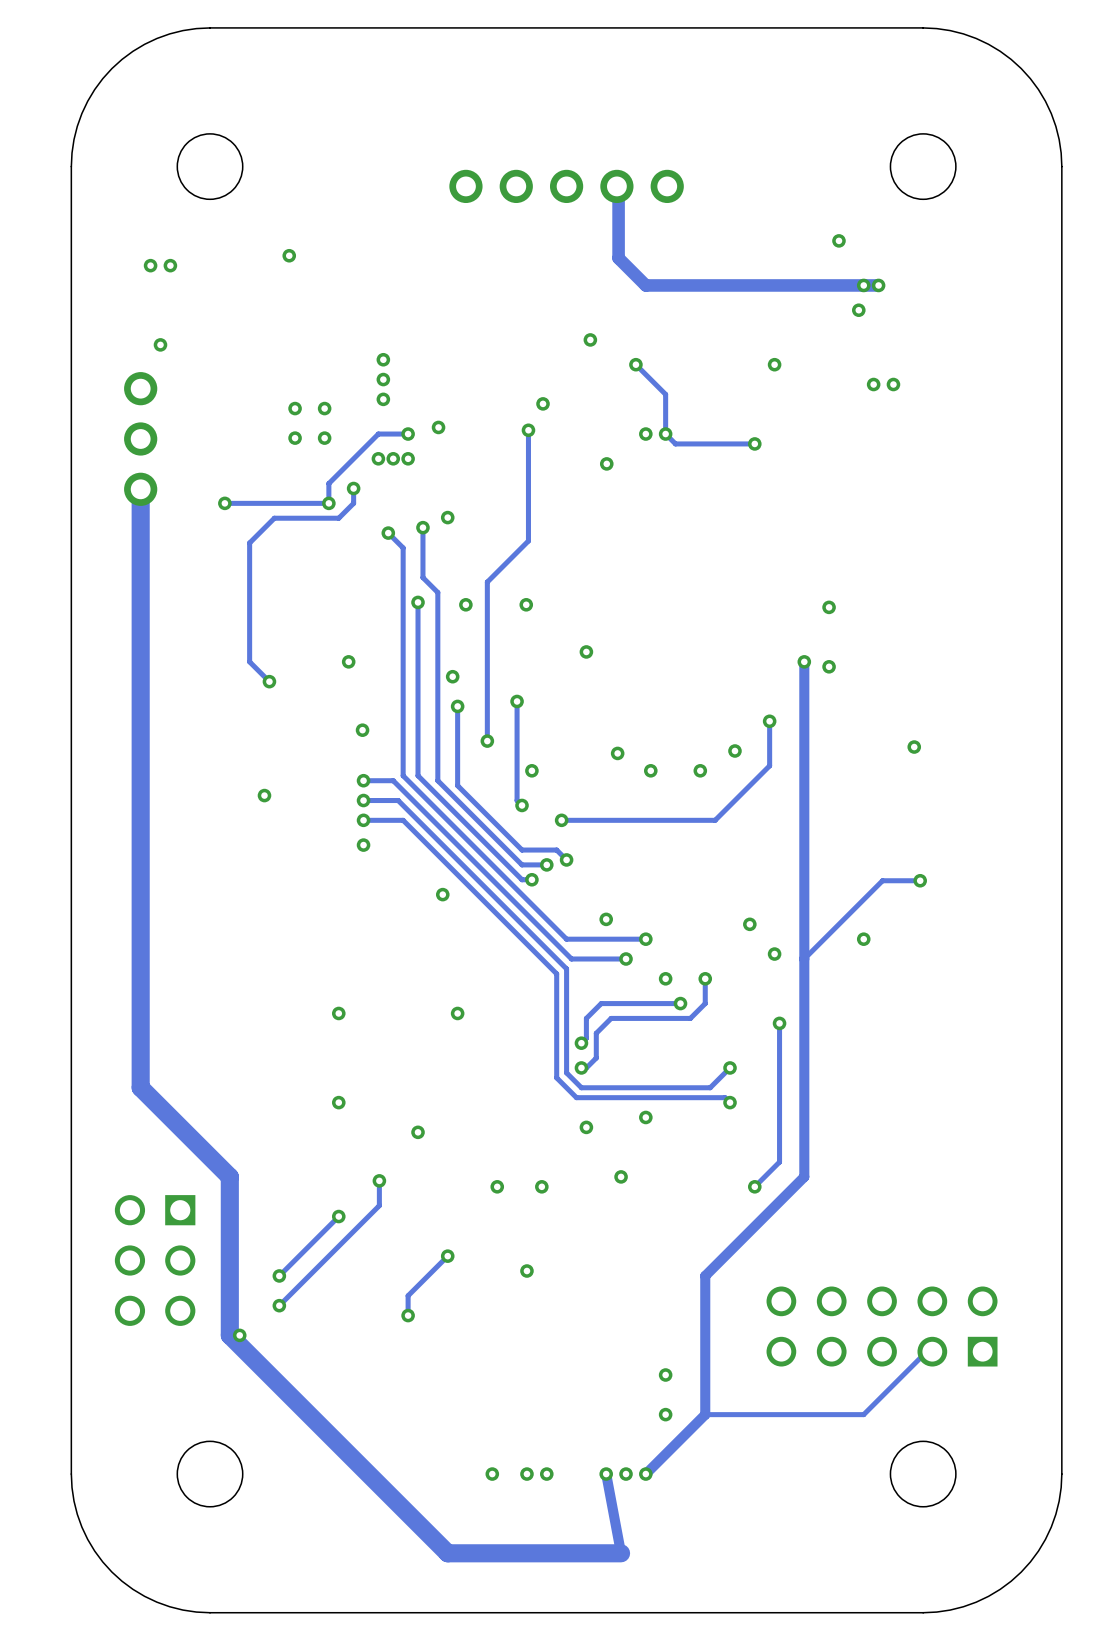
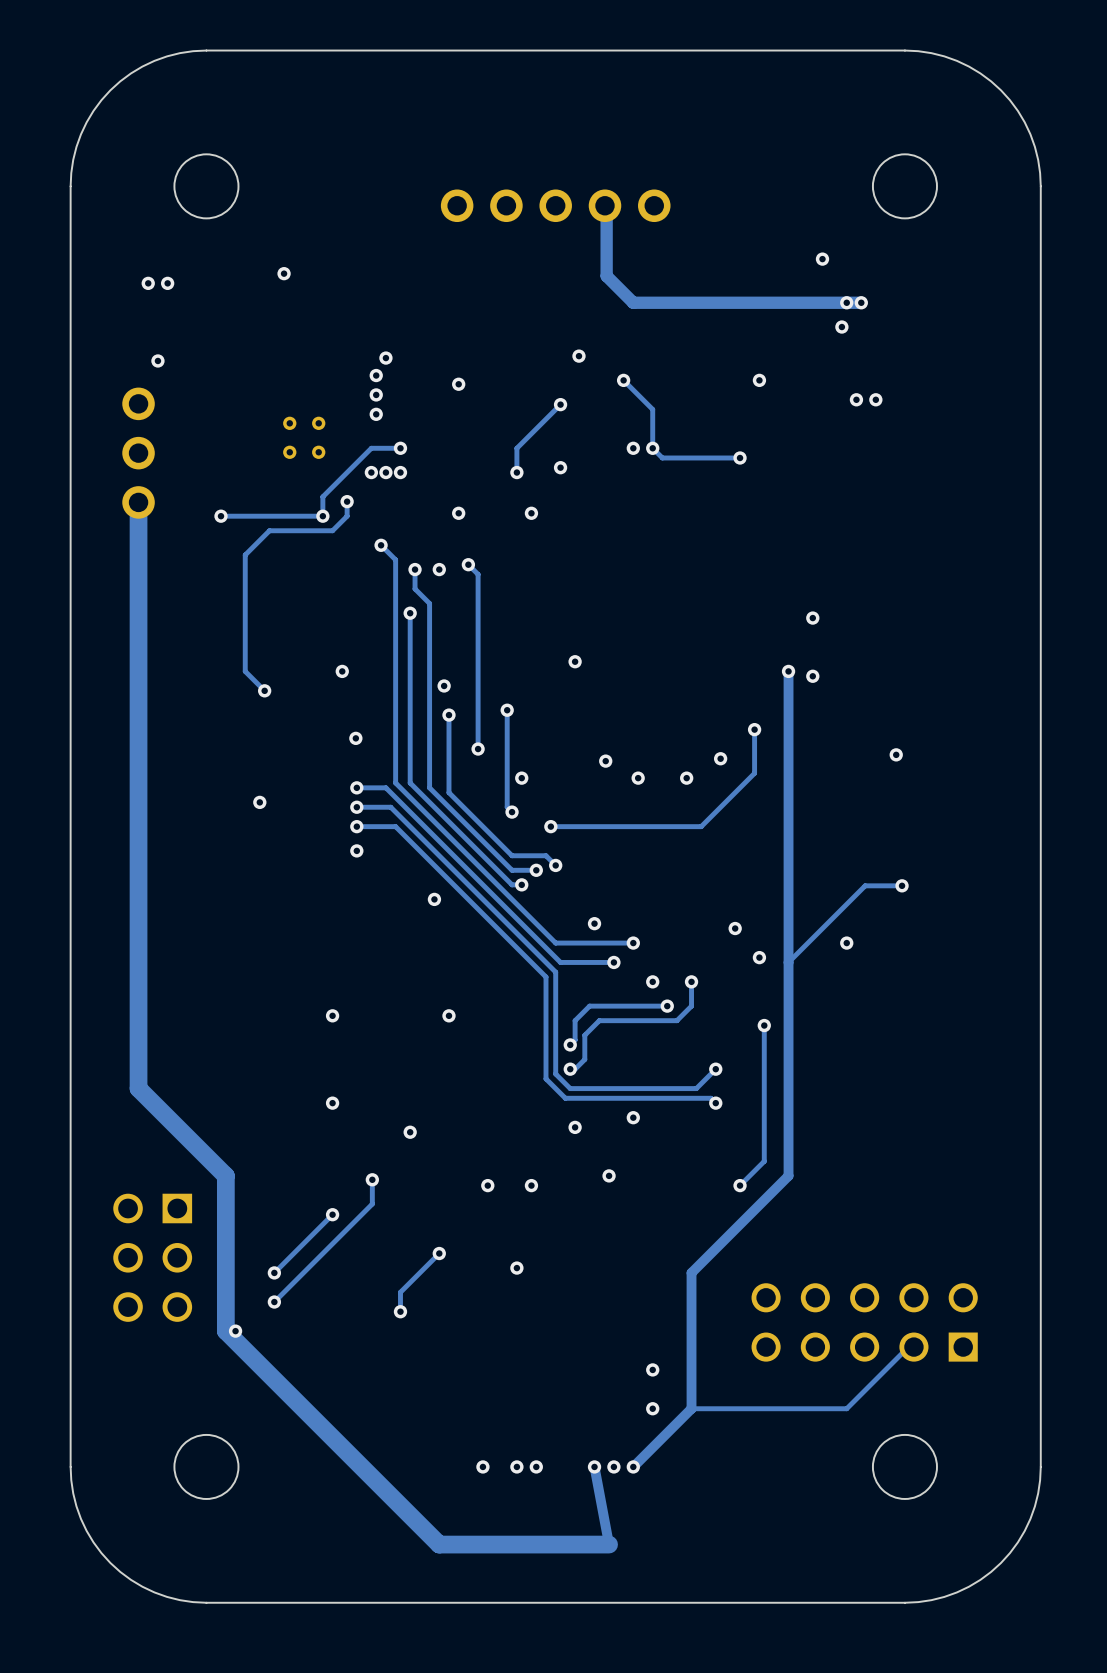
via: none -> (385, 358)
via: none -> (458, 384)
track: none -> (560, 404) (516, 448) (516, 472)
via: none -> (560, 404)
via: (543, 403) -> none
via: (438, 427) -> none
track: (528, 430) (528, 540) (487, 582) -> (468, 564) (478, 574) (478, 593)
via: (528, 430) -> none
via: none -> (560, 467)
via: none -> (516, 472)
via: (606, 463) -> none
via: none -> (458, 513)
via: none -> (531, 513)
via: (447, 517) -> none
track: (422, 527) (422, 557) -> none
via: (422, 527) -> none
via: none -> (468, 564)
via: none -> (415, 569)
via: none -> (439, 569)
via: (465, 604) -> none
via: (526, 604) -> none

